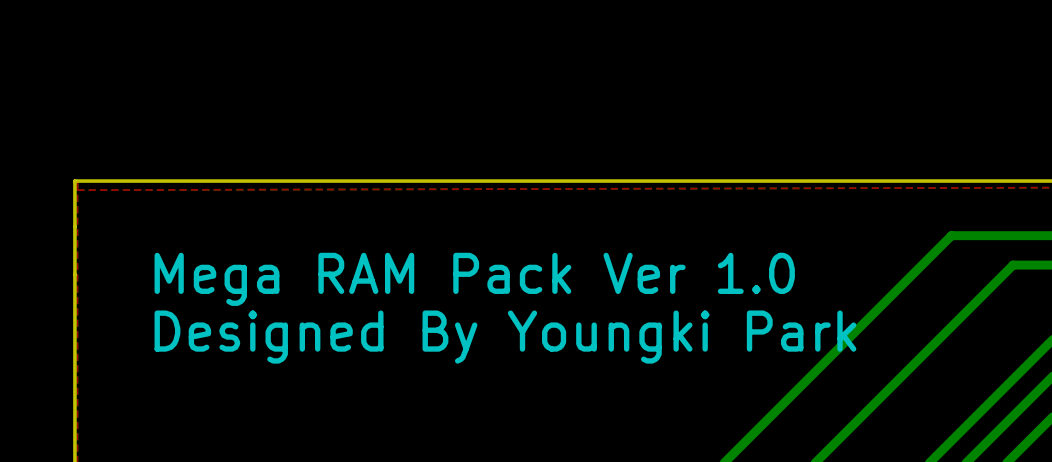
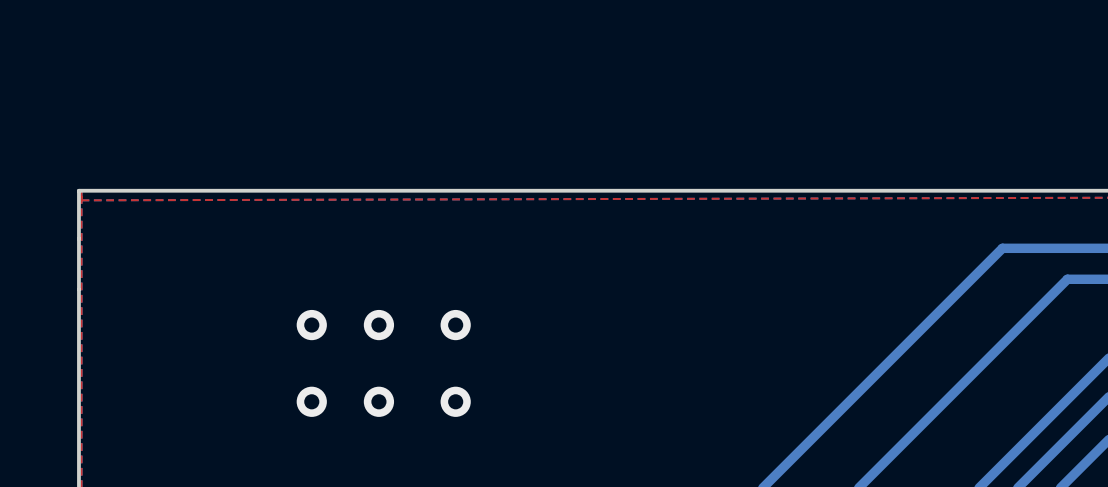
text: Mega RAM Pack Ver 1.0 (474, 279) -> none
via: none -> (311, 325)
via: none -> (378, 325)
via: none -> (455, 325)
text: Designed By Youngki Park (505, 337) -> none
via: none -> (311, 401)
via: none -> (378, 401)
via: none -> (455, 401)

